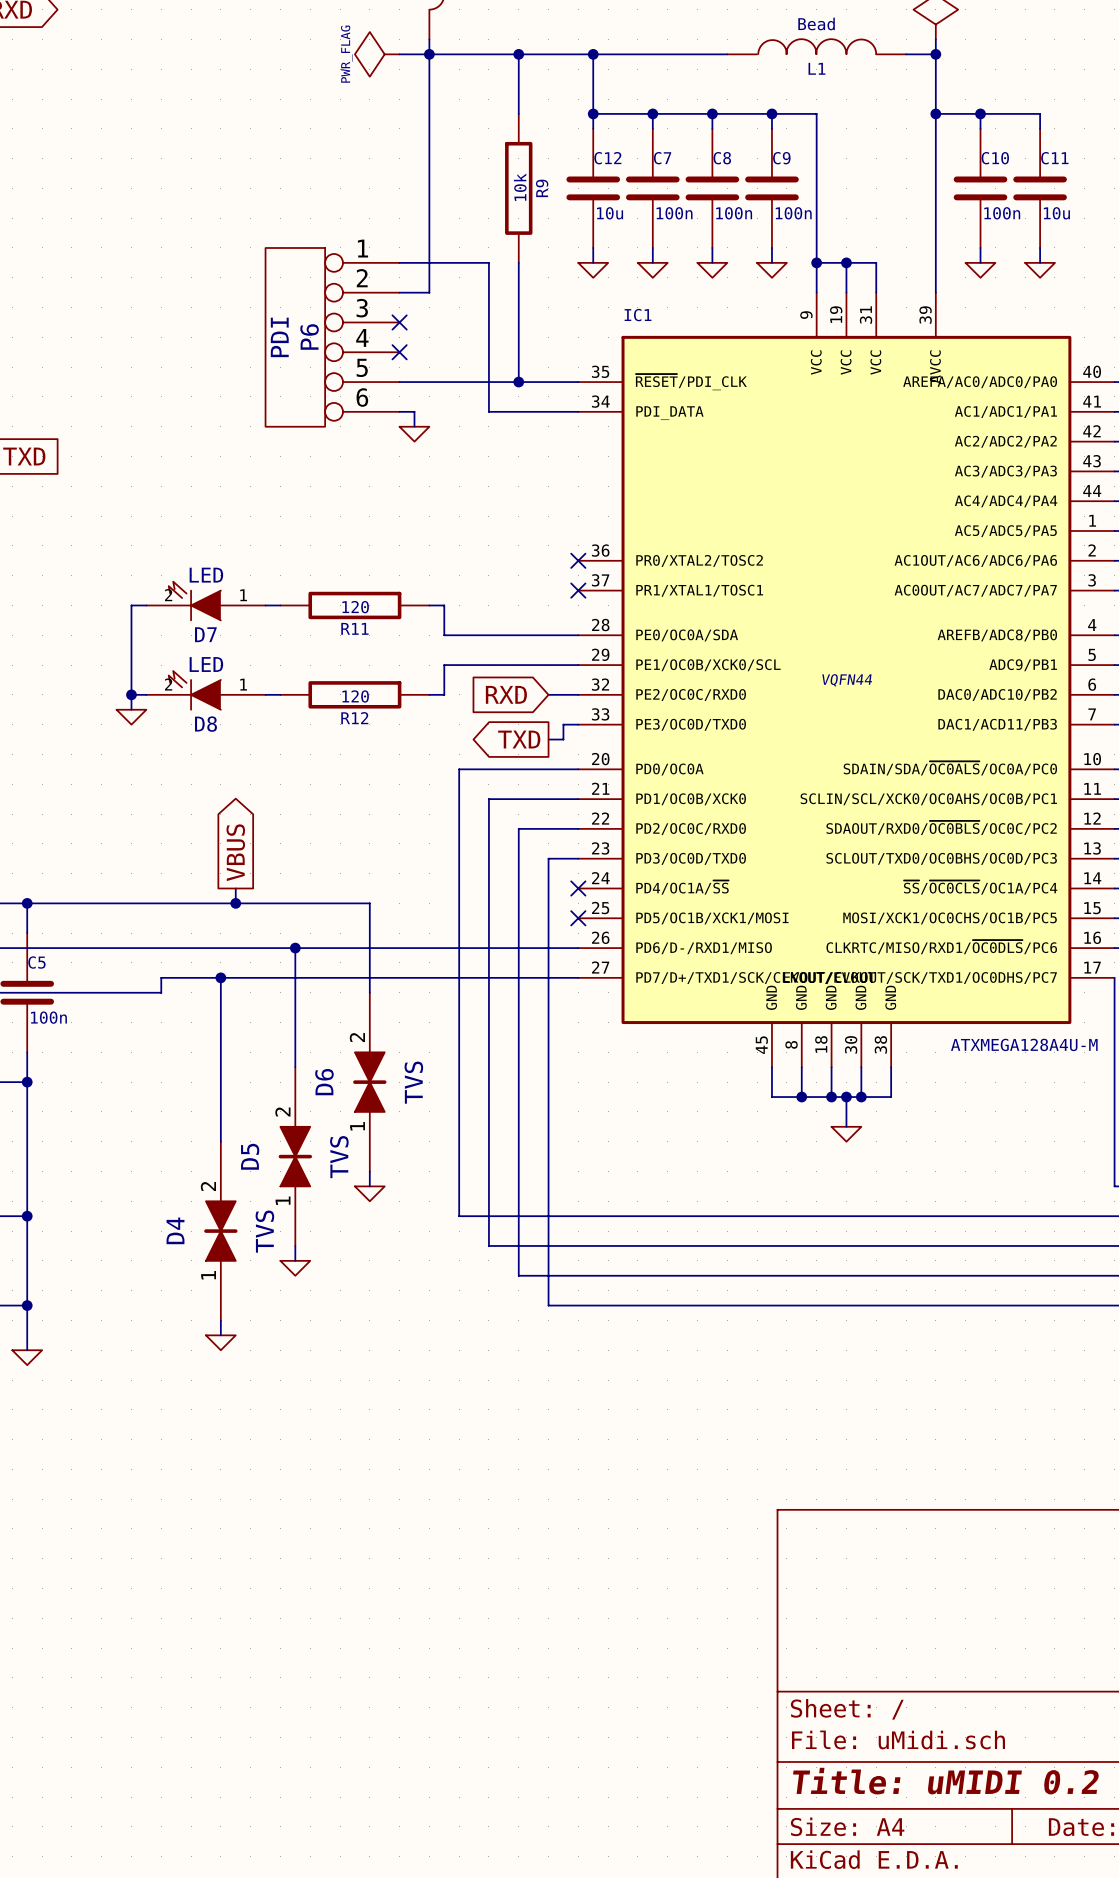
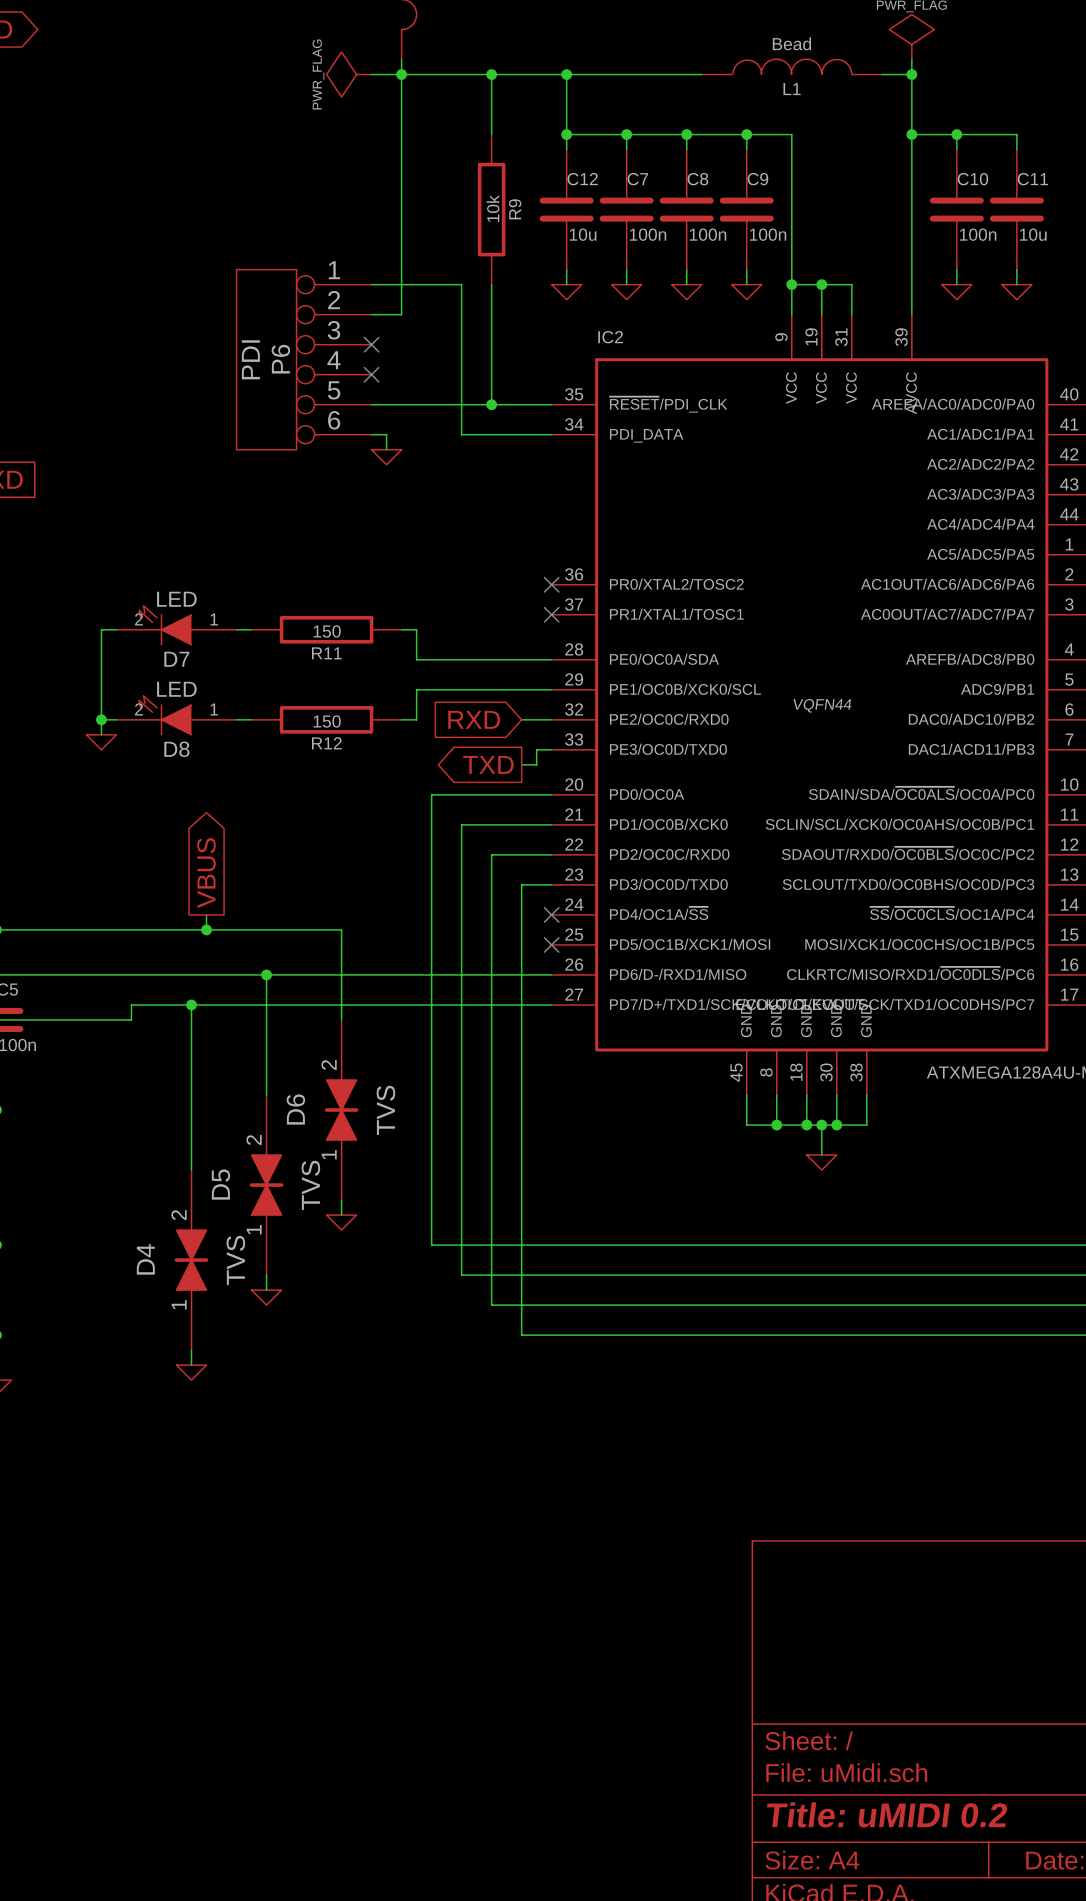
IC1 name: IC1 (638, 315) -> IC2 (610, 337)
R11 value: 120 (355, 607) -> 150 (327, 631)
R12 value: 120 (355, 696) -> 150 (327, 721)

